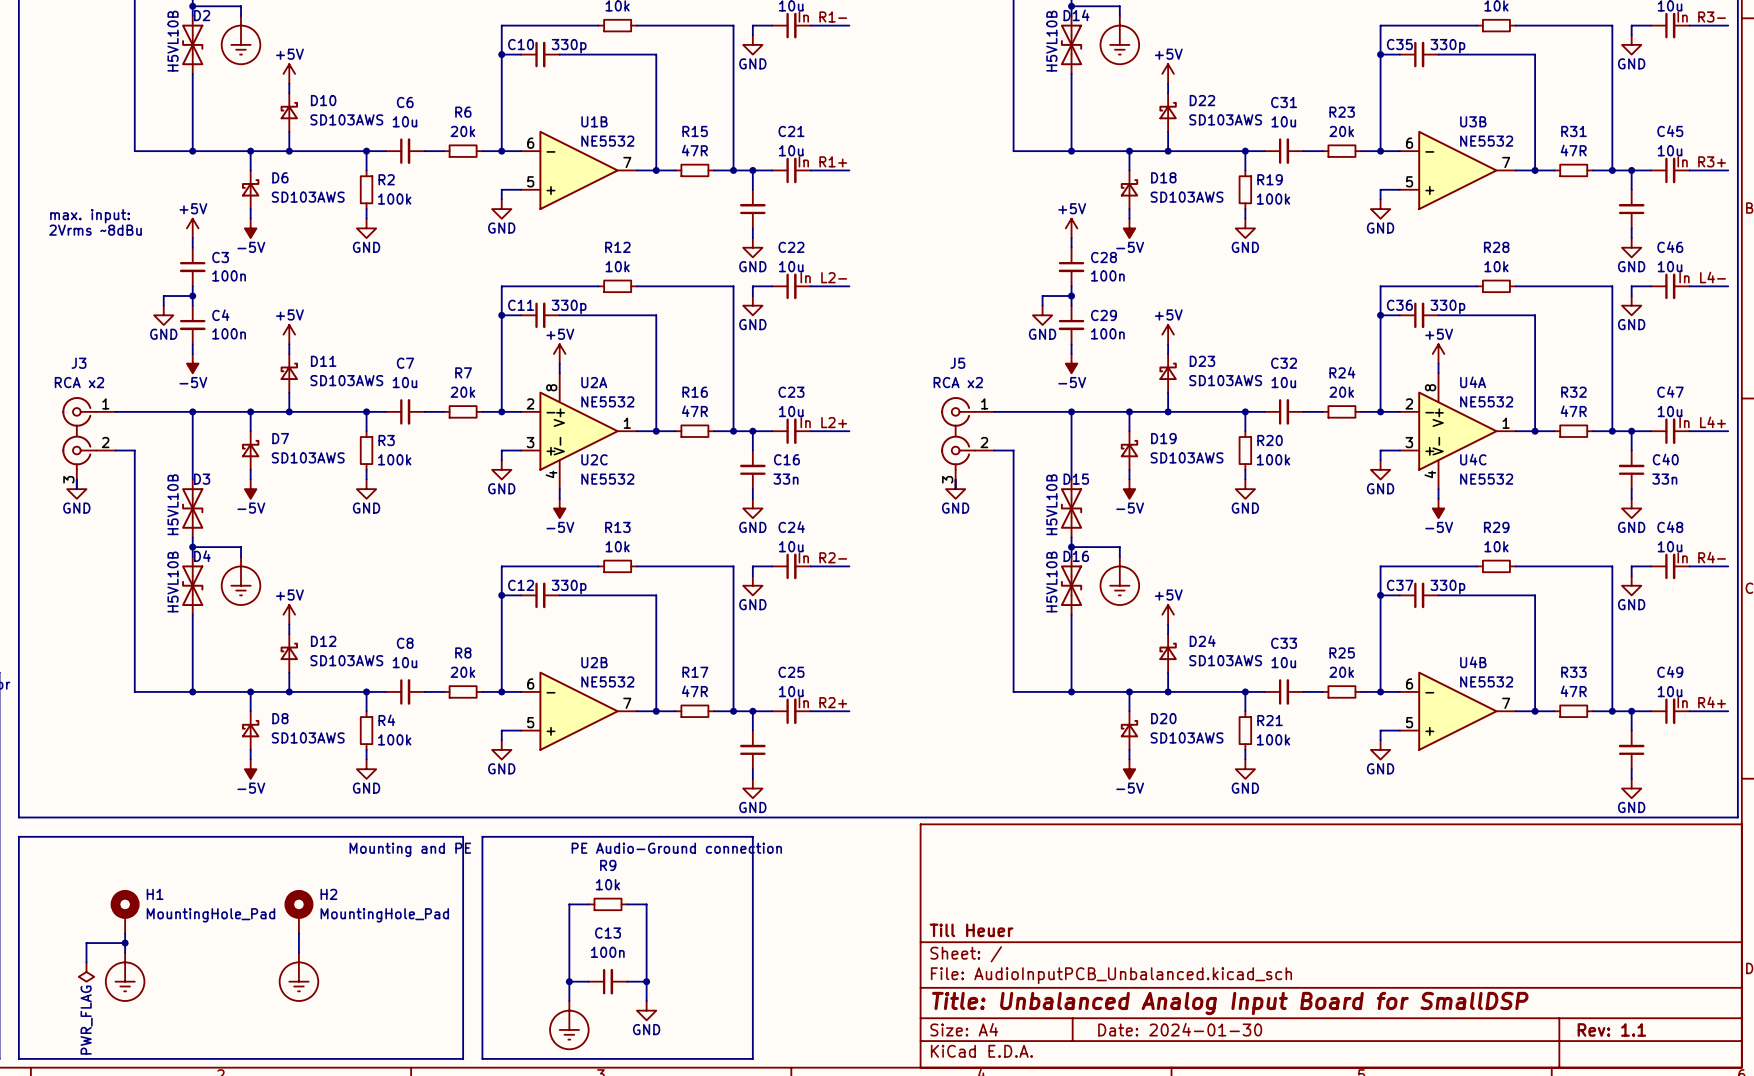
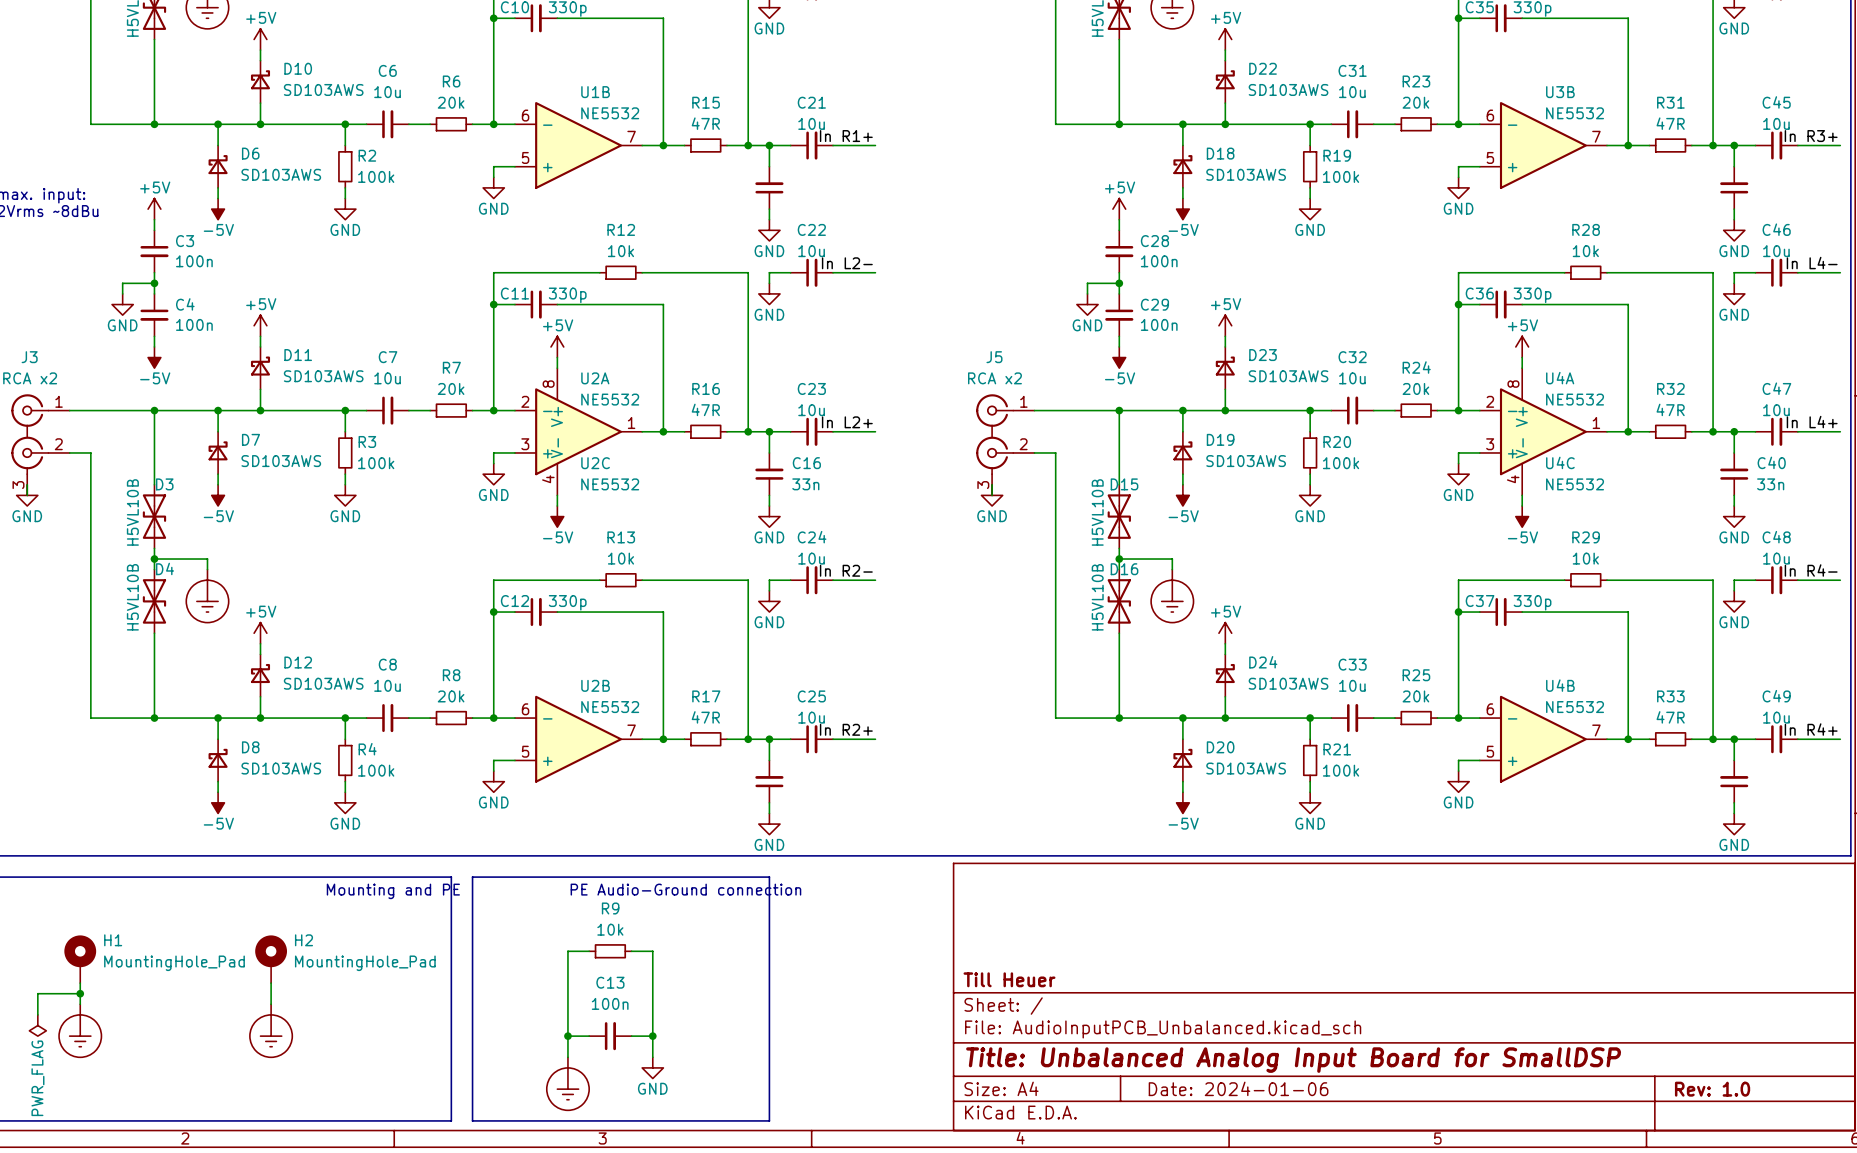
title block: Date: 2024-01-30 (1180, 1029) -> Date: 2024-01-06 (1238, 1088)
title block: Rev: 1.1 (1611, 1029) -> Rev: 1.0 (1712, 1089)

